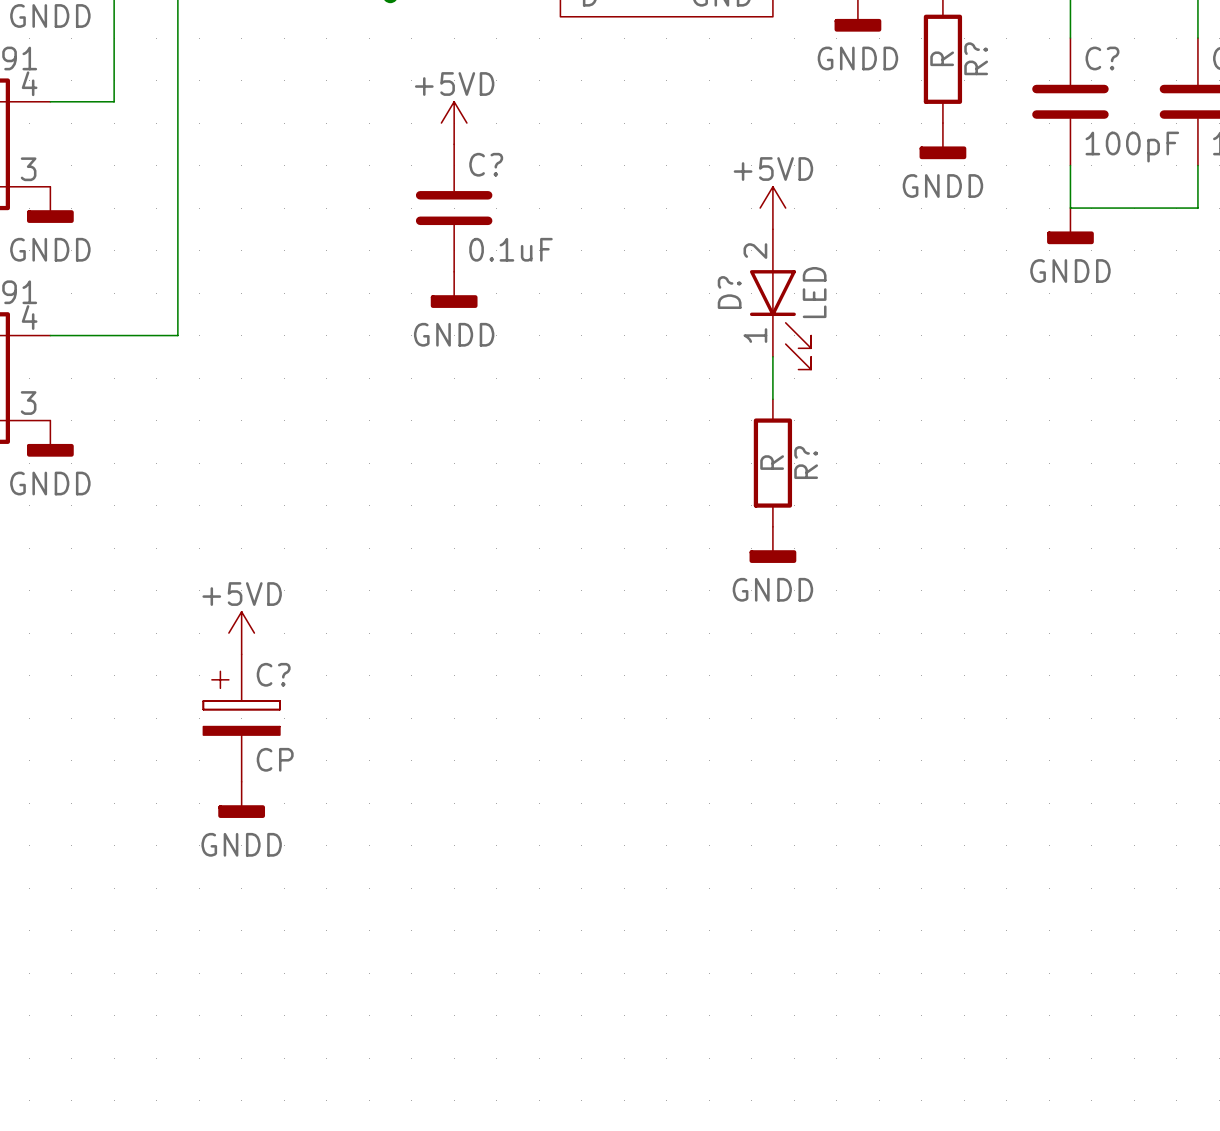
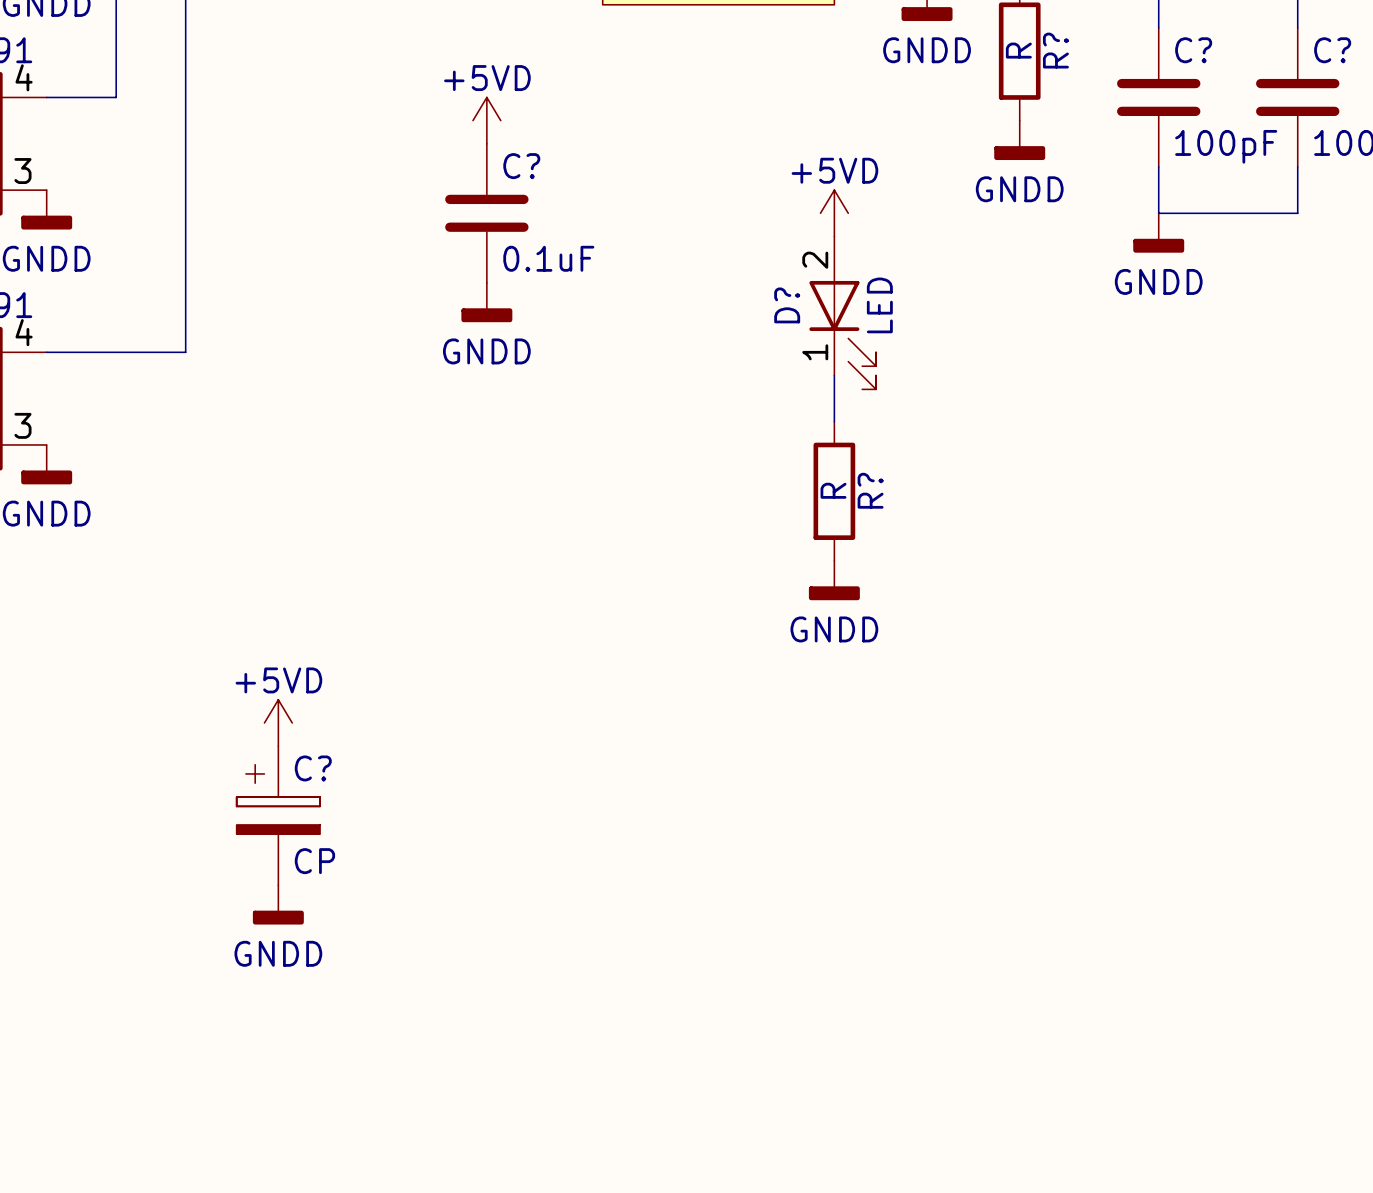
power symbol position: +5VD (241, 633) -> +5VD (278, 722)
C? position: (241, 718) -> (278, 815)
power symbol position: GNDD (241, 799) -> GNDD (278, 904)

